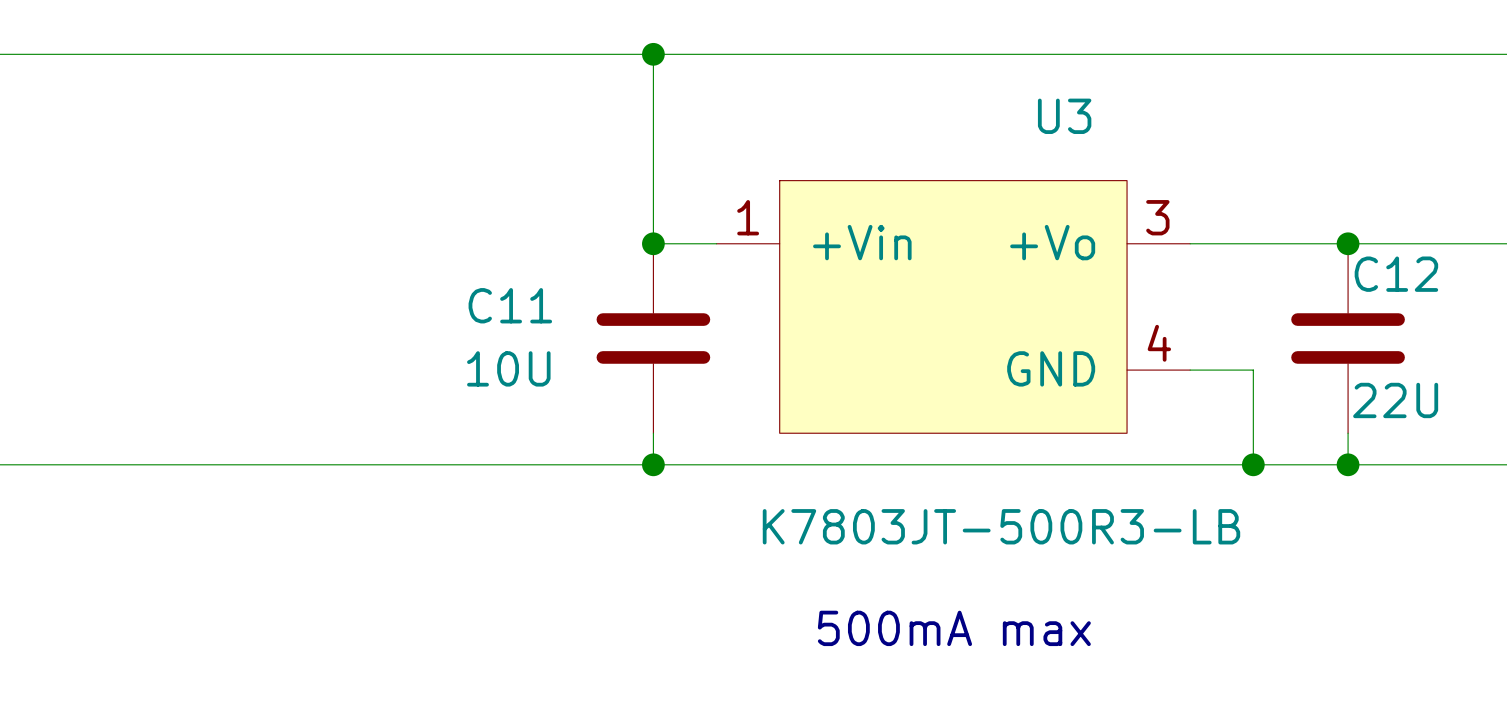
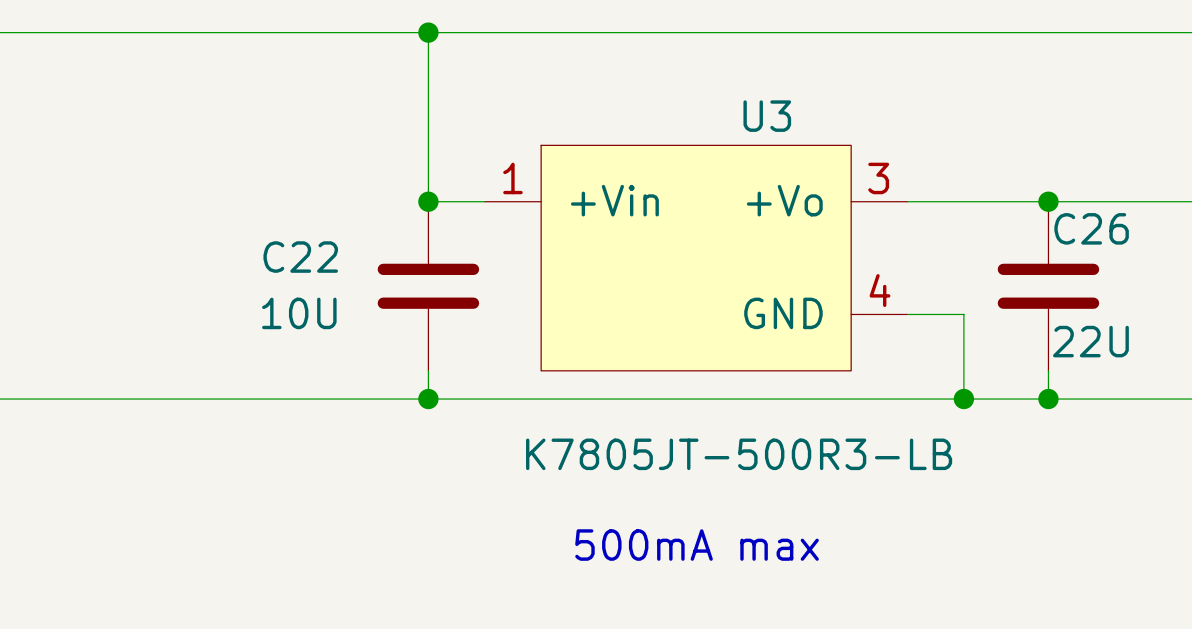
U3 name position: U3 (1064, 116) -> U3 (767, 116)
C12 name: C12 (1396, 274) -> C26 (1091, 228)
C11 name: C11 (510, 305) -> C22 (300, 257)
U3 value: K7803JT-500R3-LB (1001, 526) -> K7805JT-500R3-LB (739, 454)

